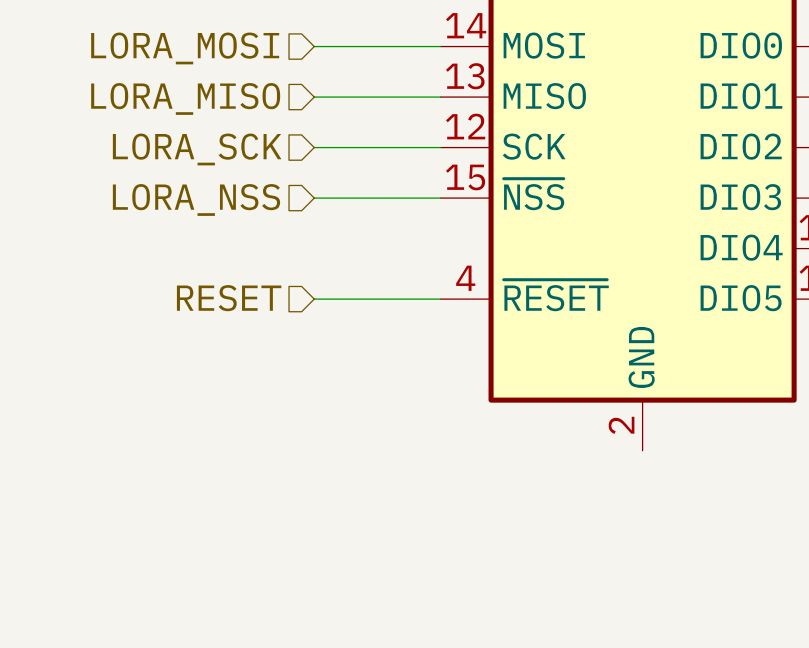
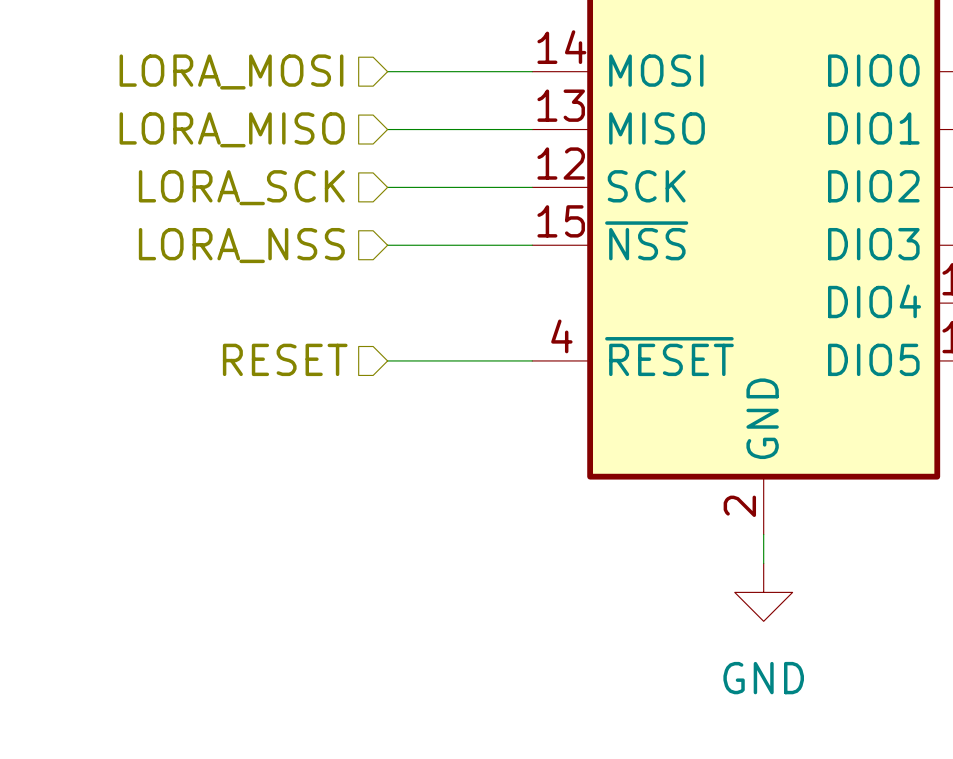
wire: none -> (763, 534) (763, 563)
power symbol: none -> GND (763, 592)

